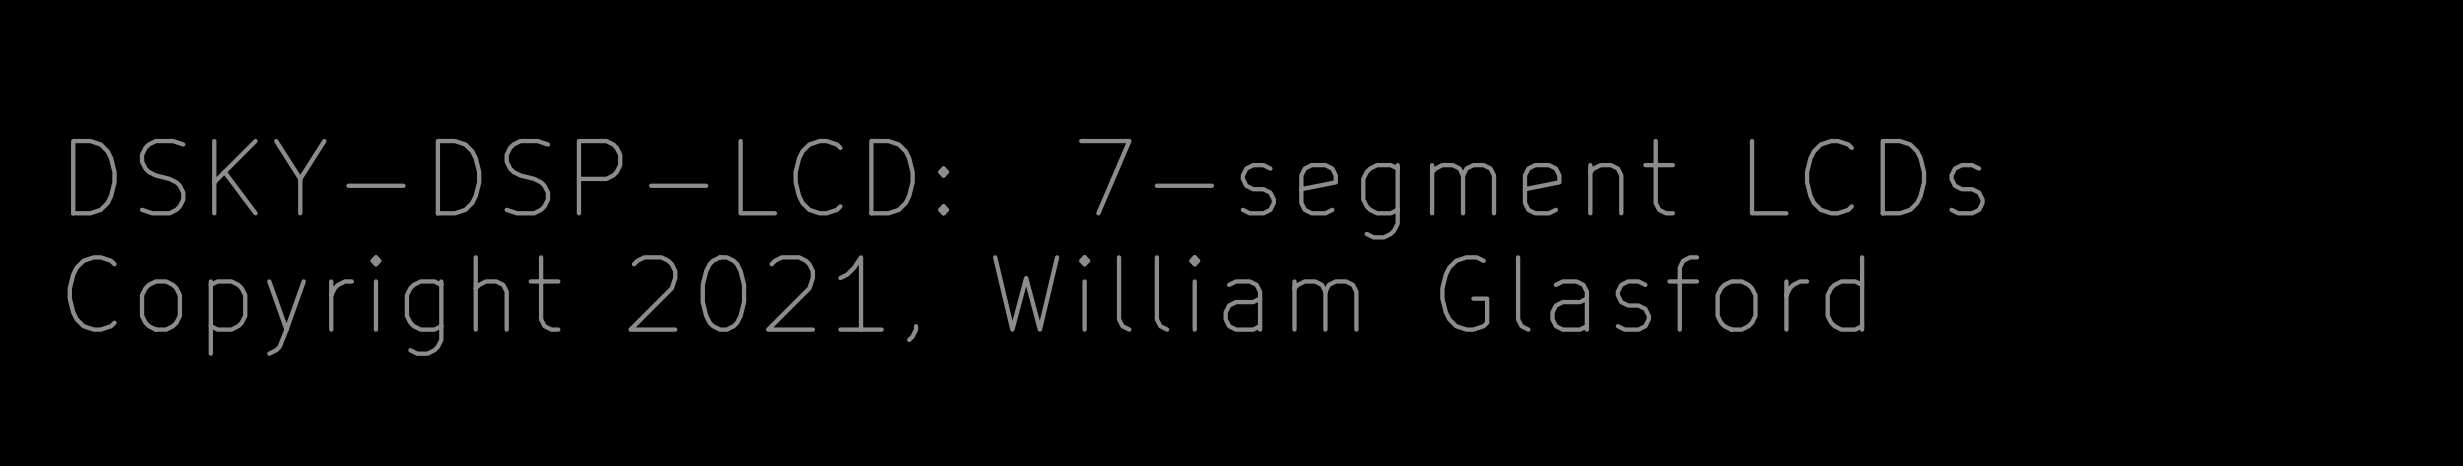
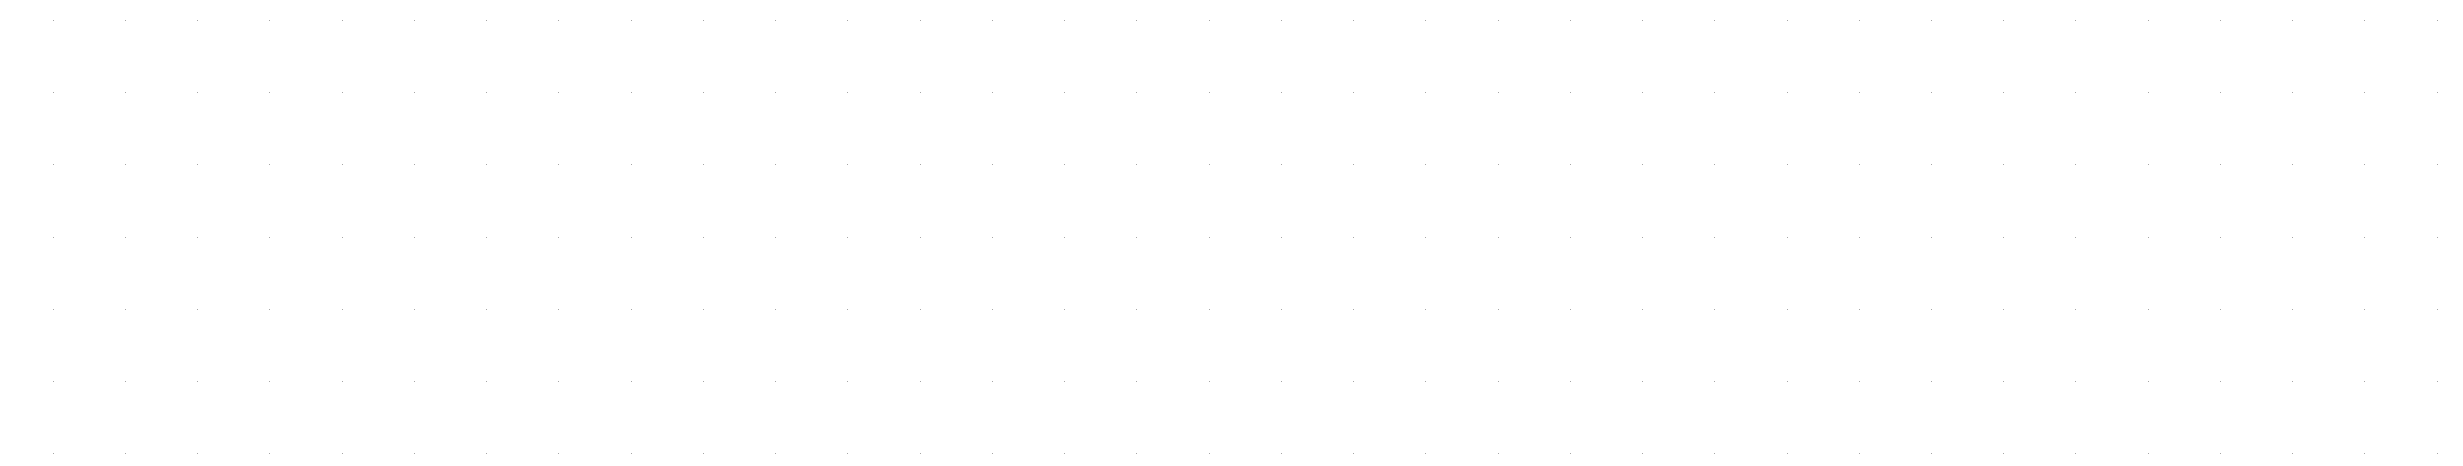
text: DSKY-DSP-LCD: 7-segment LCDs (1027, 189) -> none
text: Copyright 2021, William Glasford (965, 305) -> none

